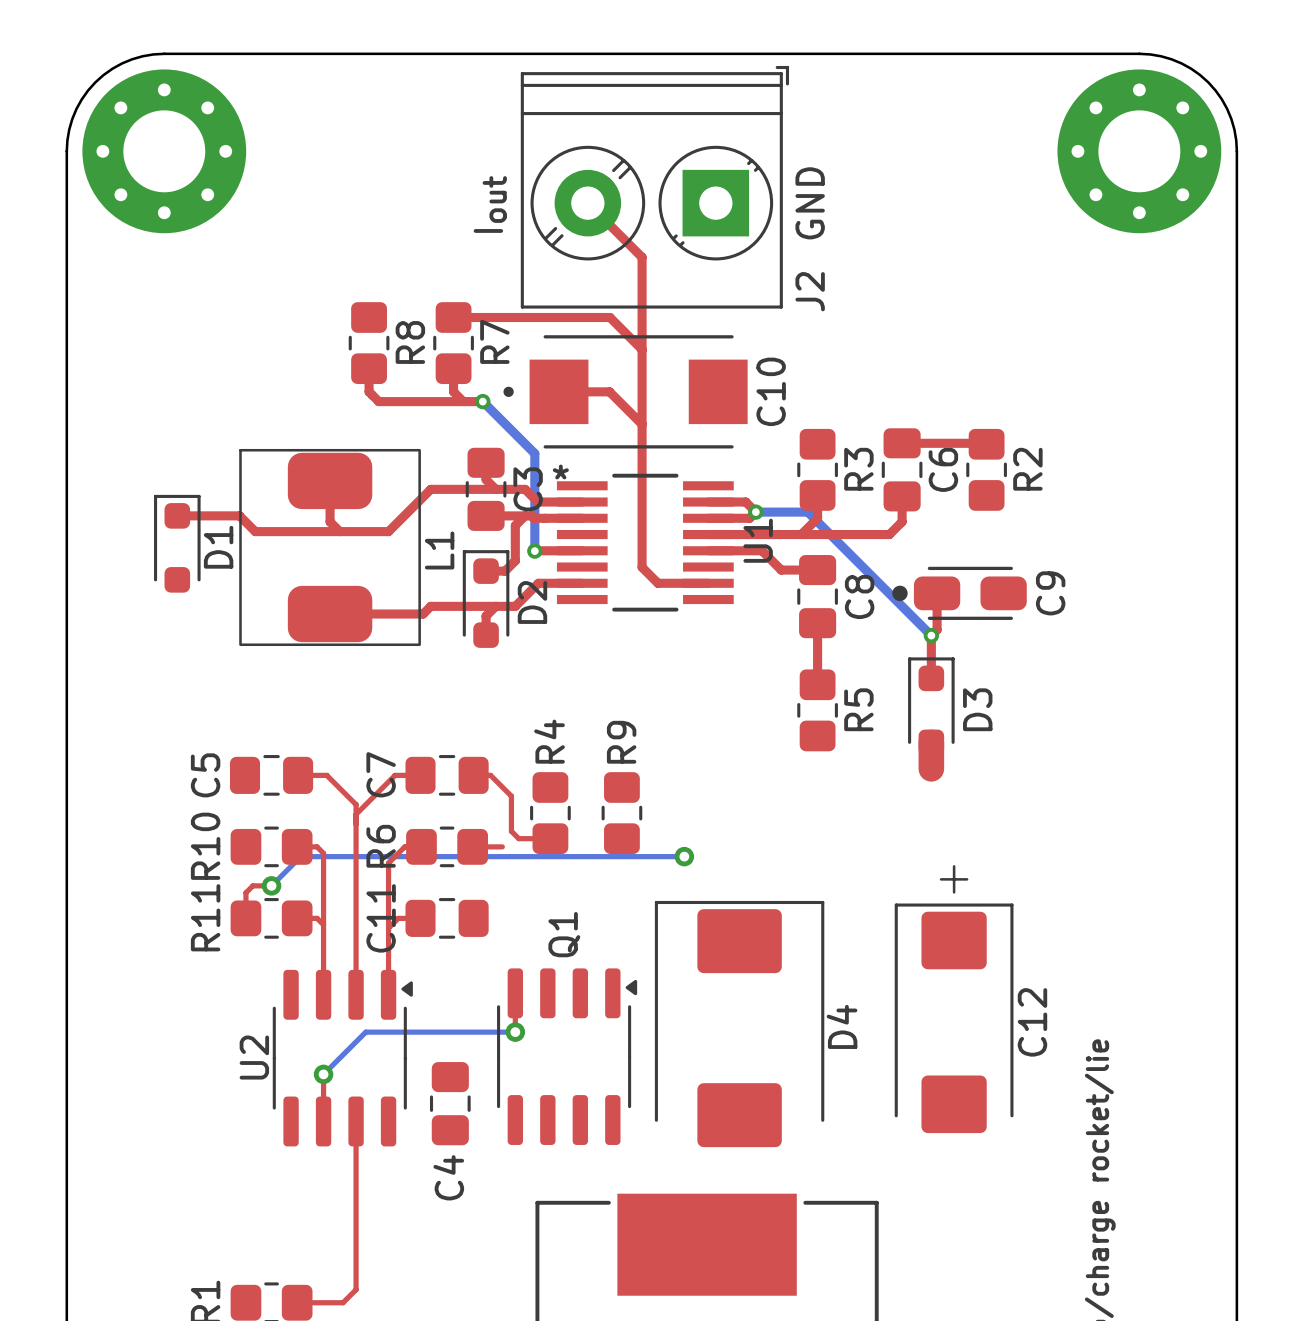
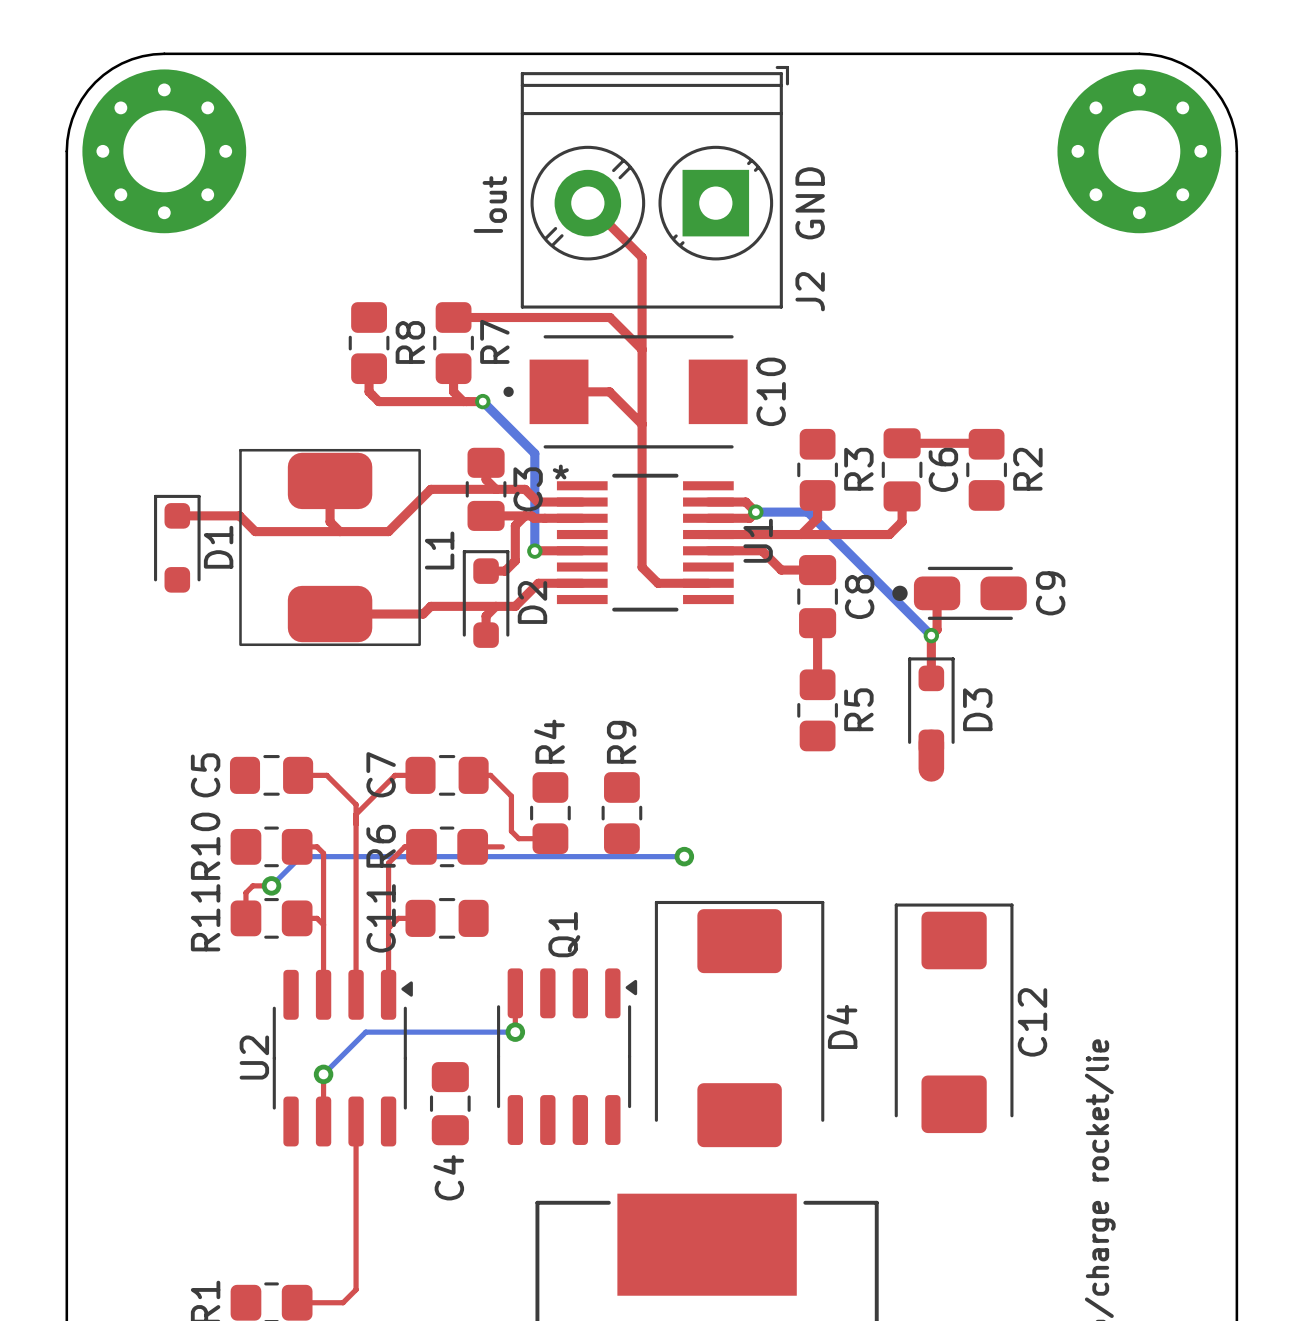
line: (954, 866) (954, 892) -> none
line: (941, 879) (967, 879) -> none

